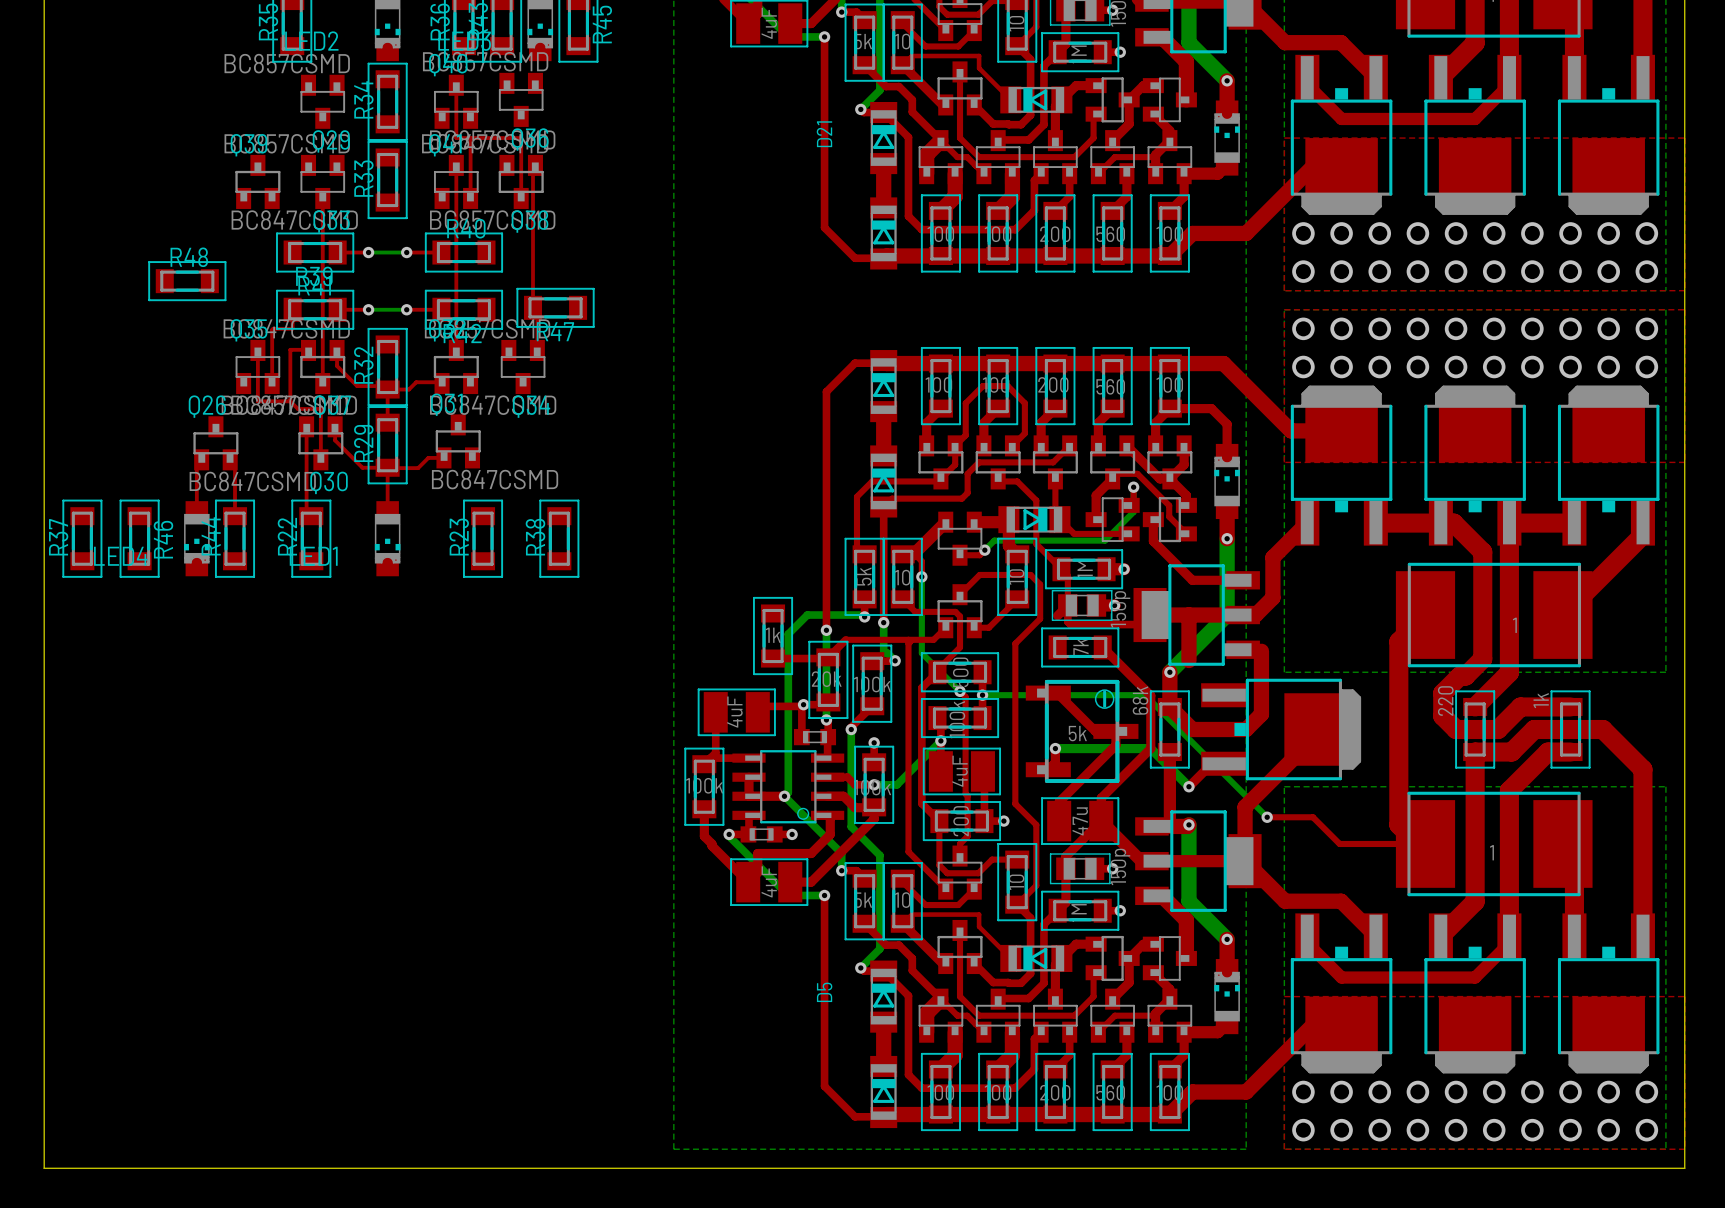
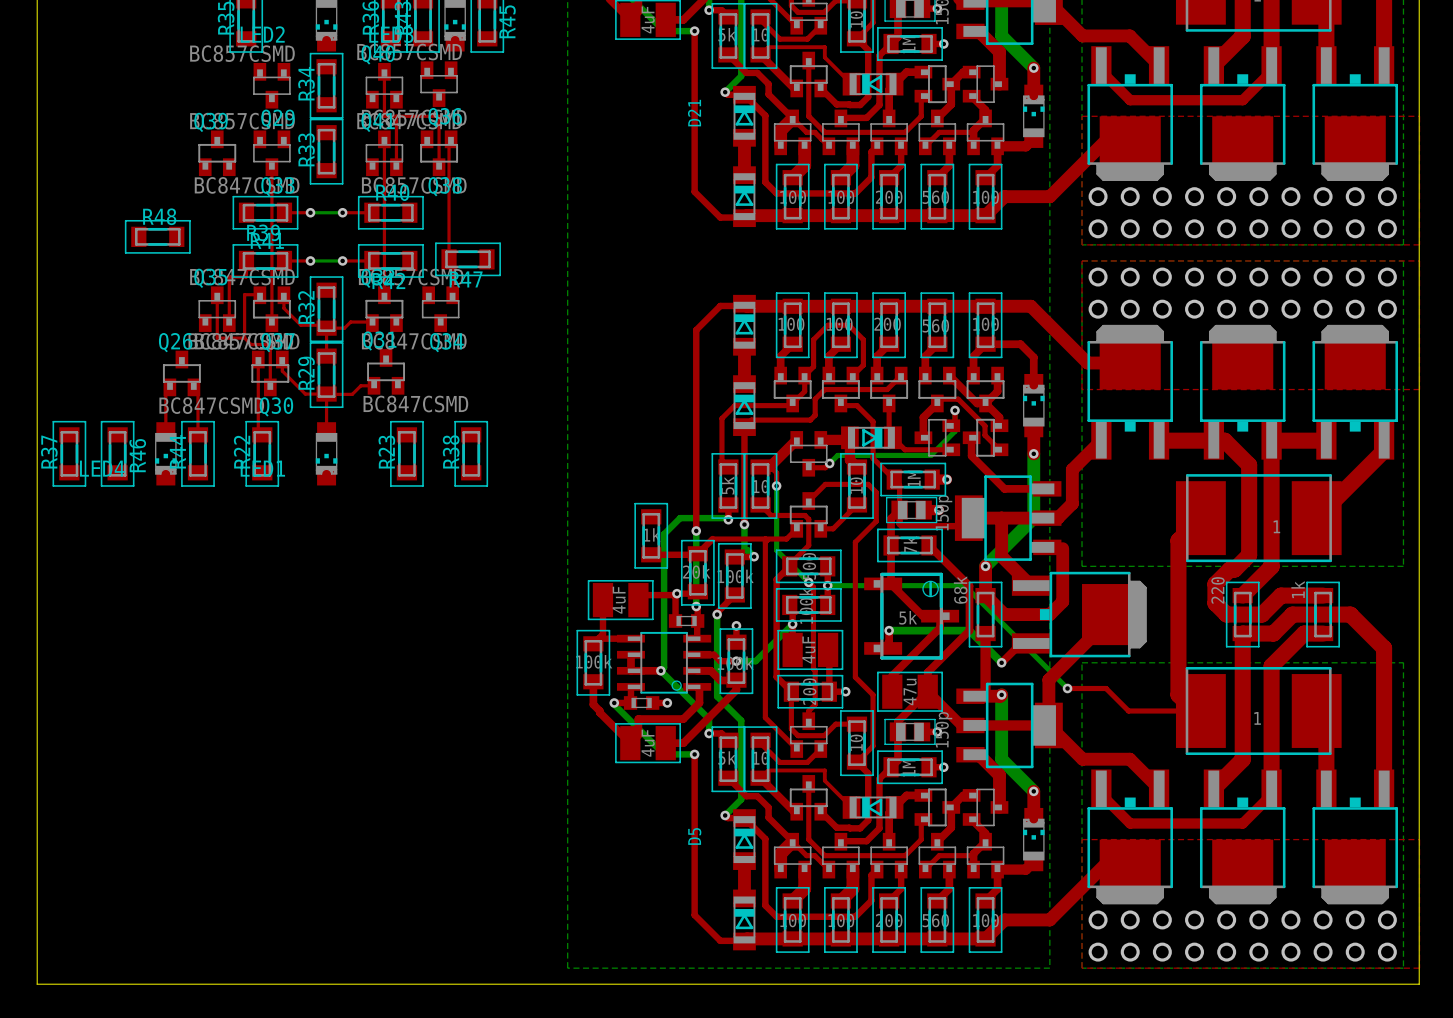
top track: none -> (891, 518) (891, 583)
top track: none -> (1001, 556) (1030, 585)

